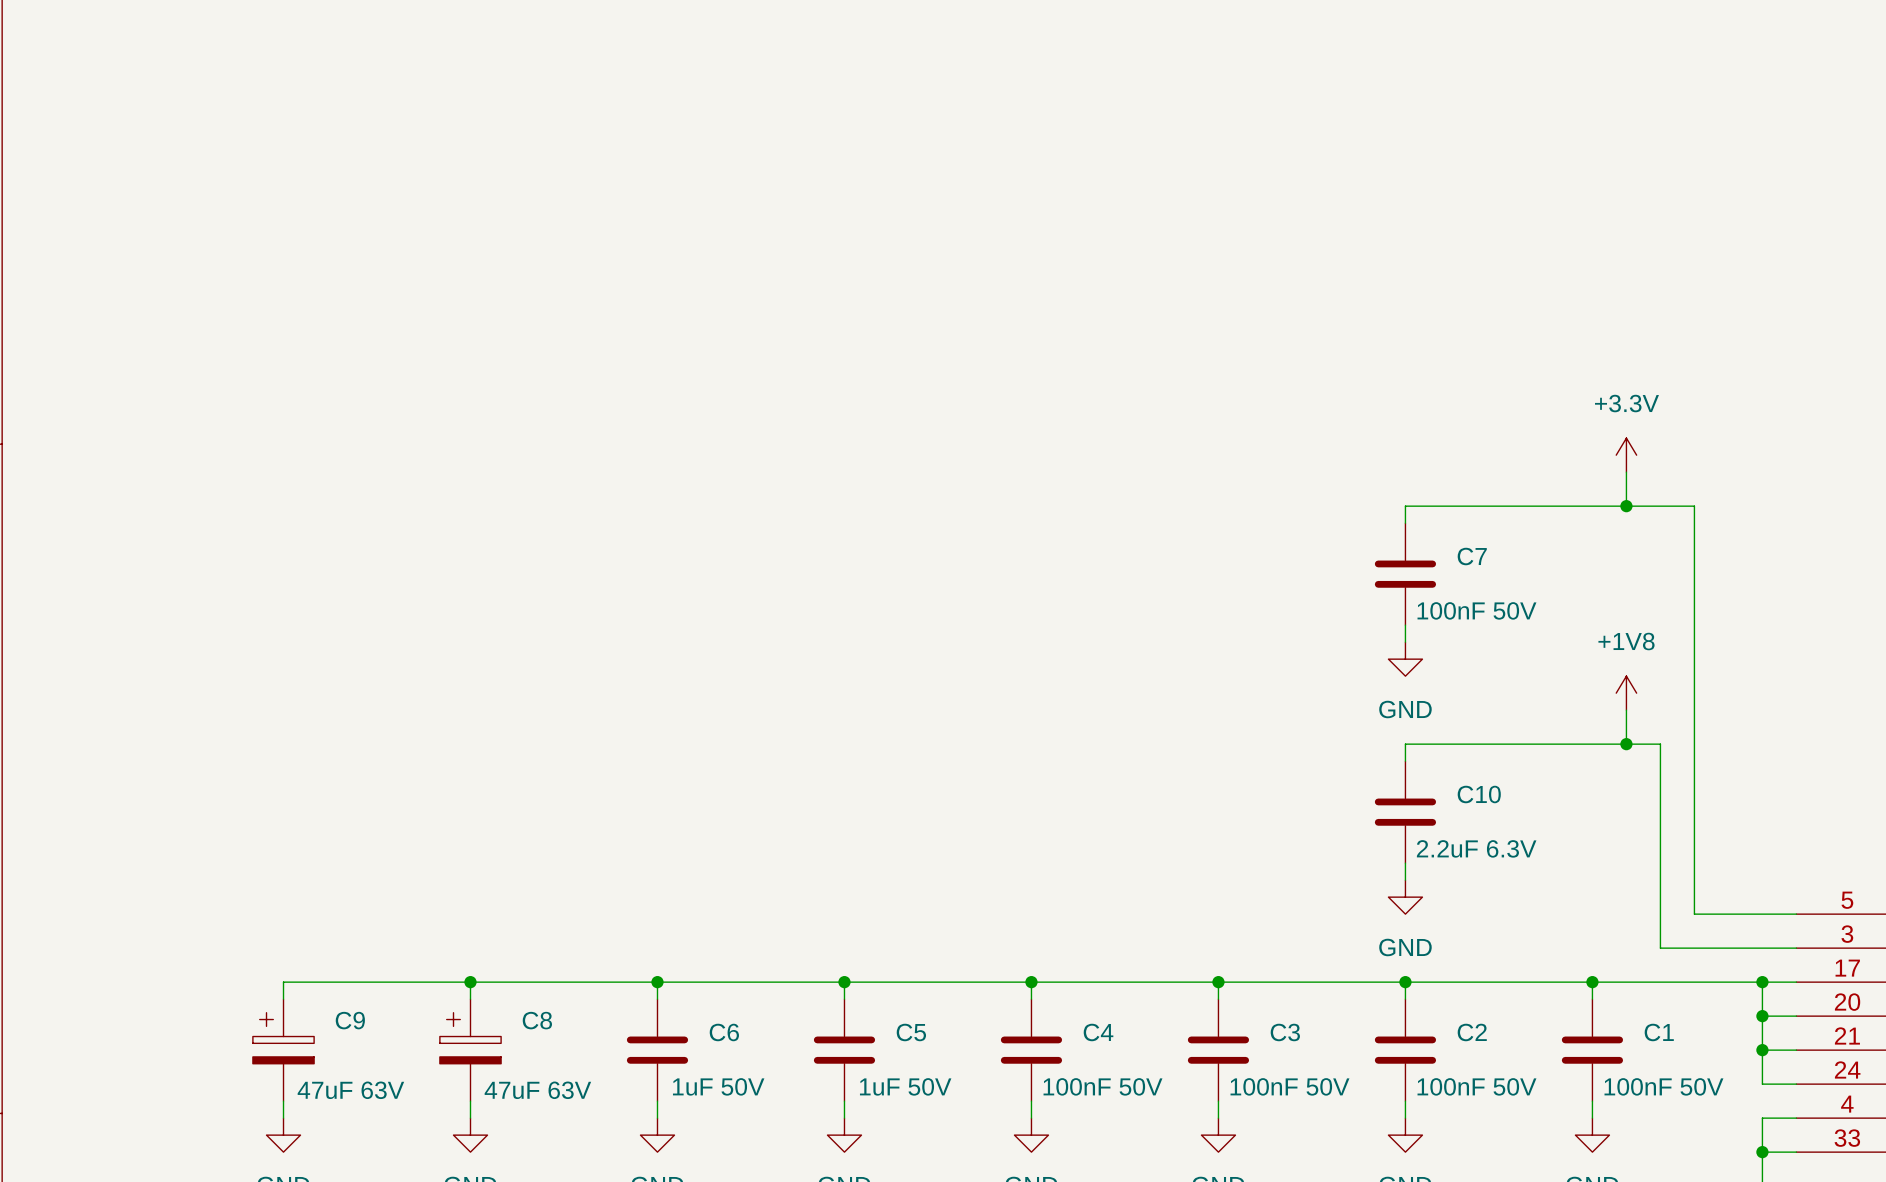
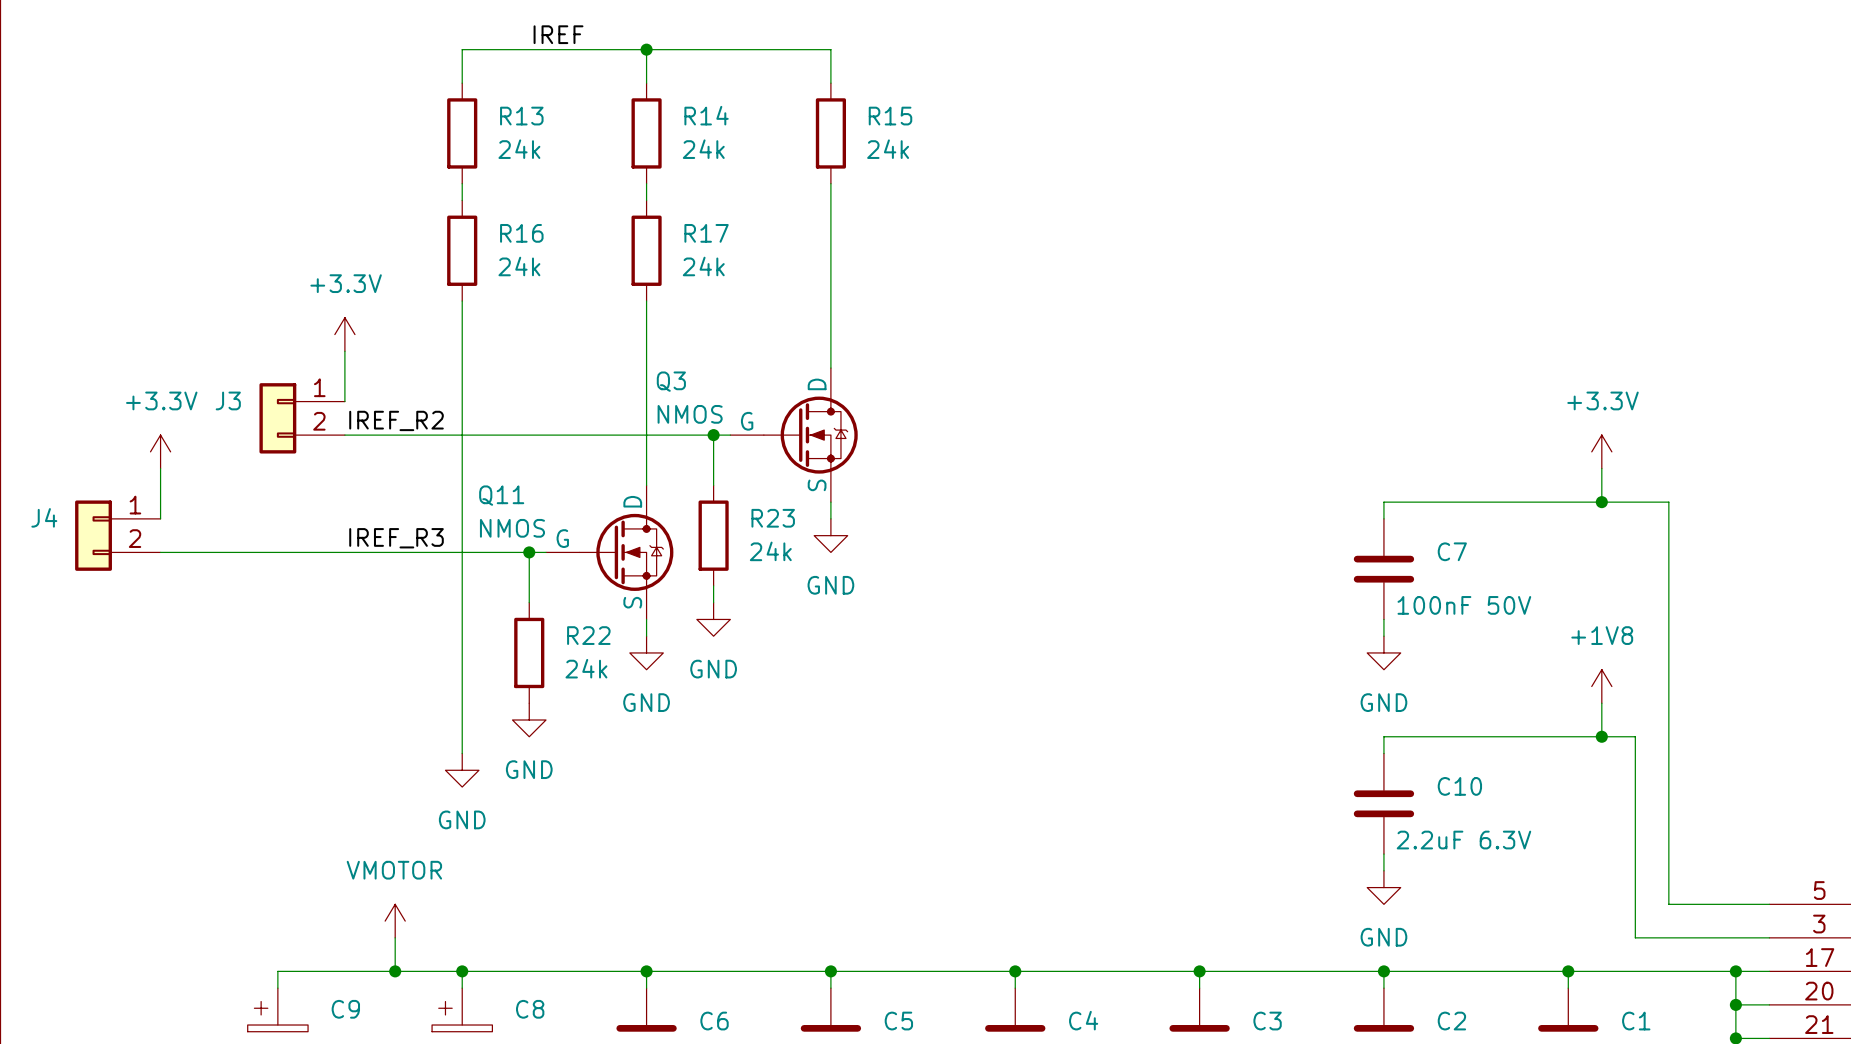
label: none -> IREF (558, 34)
wire: none -> (646, 49) (646, 83)
junction: none -> (646, 49)
wire: none -> (462, 83) (462, 49) (830, 49) (830, 83)
R13: none -> 24k (462, 133)
R14: none -> 24k (646, 133)
R15: none -> 24k (830, 133)
wire: none -> (462, 183) (462, 200)
wire: none -> (646, 183) (646, 200)
wire: none -> (830, 183) (830, 368)
R16: none -> 24k (462, 250)
R17: none -> 24k (646, 250)
wire: none -> (462, 301) (462, 753)
wire: none -> (646, 301) (646, 485)
power symbol: none -> +3.3V (344, 334)
wire: none -> (344, 351) (344, 401)
J3: none -> (302, 418)
label: none -> IREF_R2 (396, 420)
wire: none -> (344, 435) (730, 435)
wire: none -> (713, 435) (713, 485)
junction: none -> (713, 435)
Q3: none -> NMOS (794, 435)
power symbol: none -> +3.3V (160, 451)
wire: none -> (160, 468) (160, 518)
wire: none -> (830, 502) (830, 518)
J4: none -> (117, 535)
R23: none -> 24k (713, 535)
power symbol: none -> GND (830, 535)
label: none -> IREF_R3 (396, 538)
wire: none -> (160, 552) (546, 552)
wire: none -> (529, 552) (529, 602)
junction: none -> (529, 552)
Q11: none -> NMOS (609, 552)
wire: none -> (713, 585) (713, 602)
wire: none -> (646, 619) (646, 636)
power symbol: none -> GND (713, 619)
R22: none -> 24k (529, 652)
power symbol: none -> GND (646, 652)
power symbol: none -> GND (529, 720)
power symbol: none -> GND (462, 770)
power symbol: none -> VMOTOR (395, 921)
wire: none -> (395, 937) (395, 971)
junction: none -> (395, 971)

